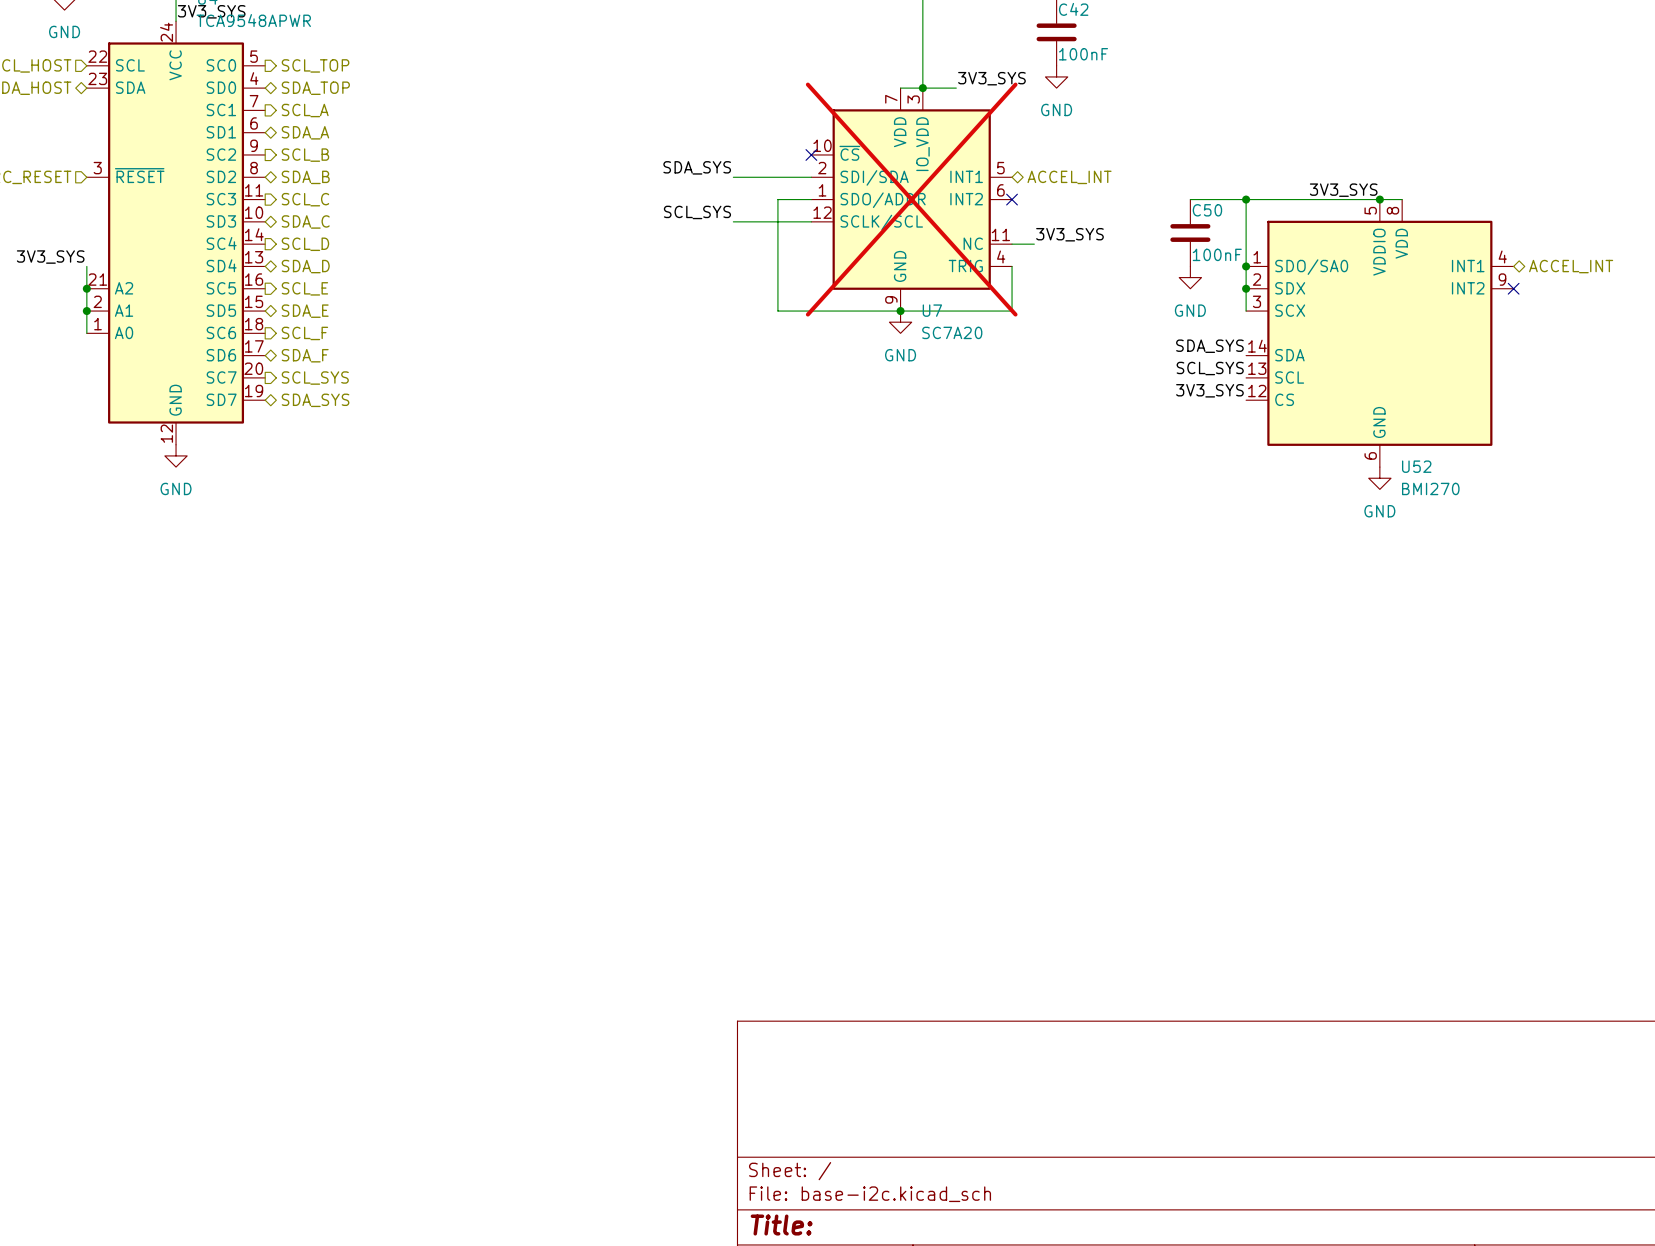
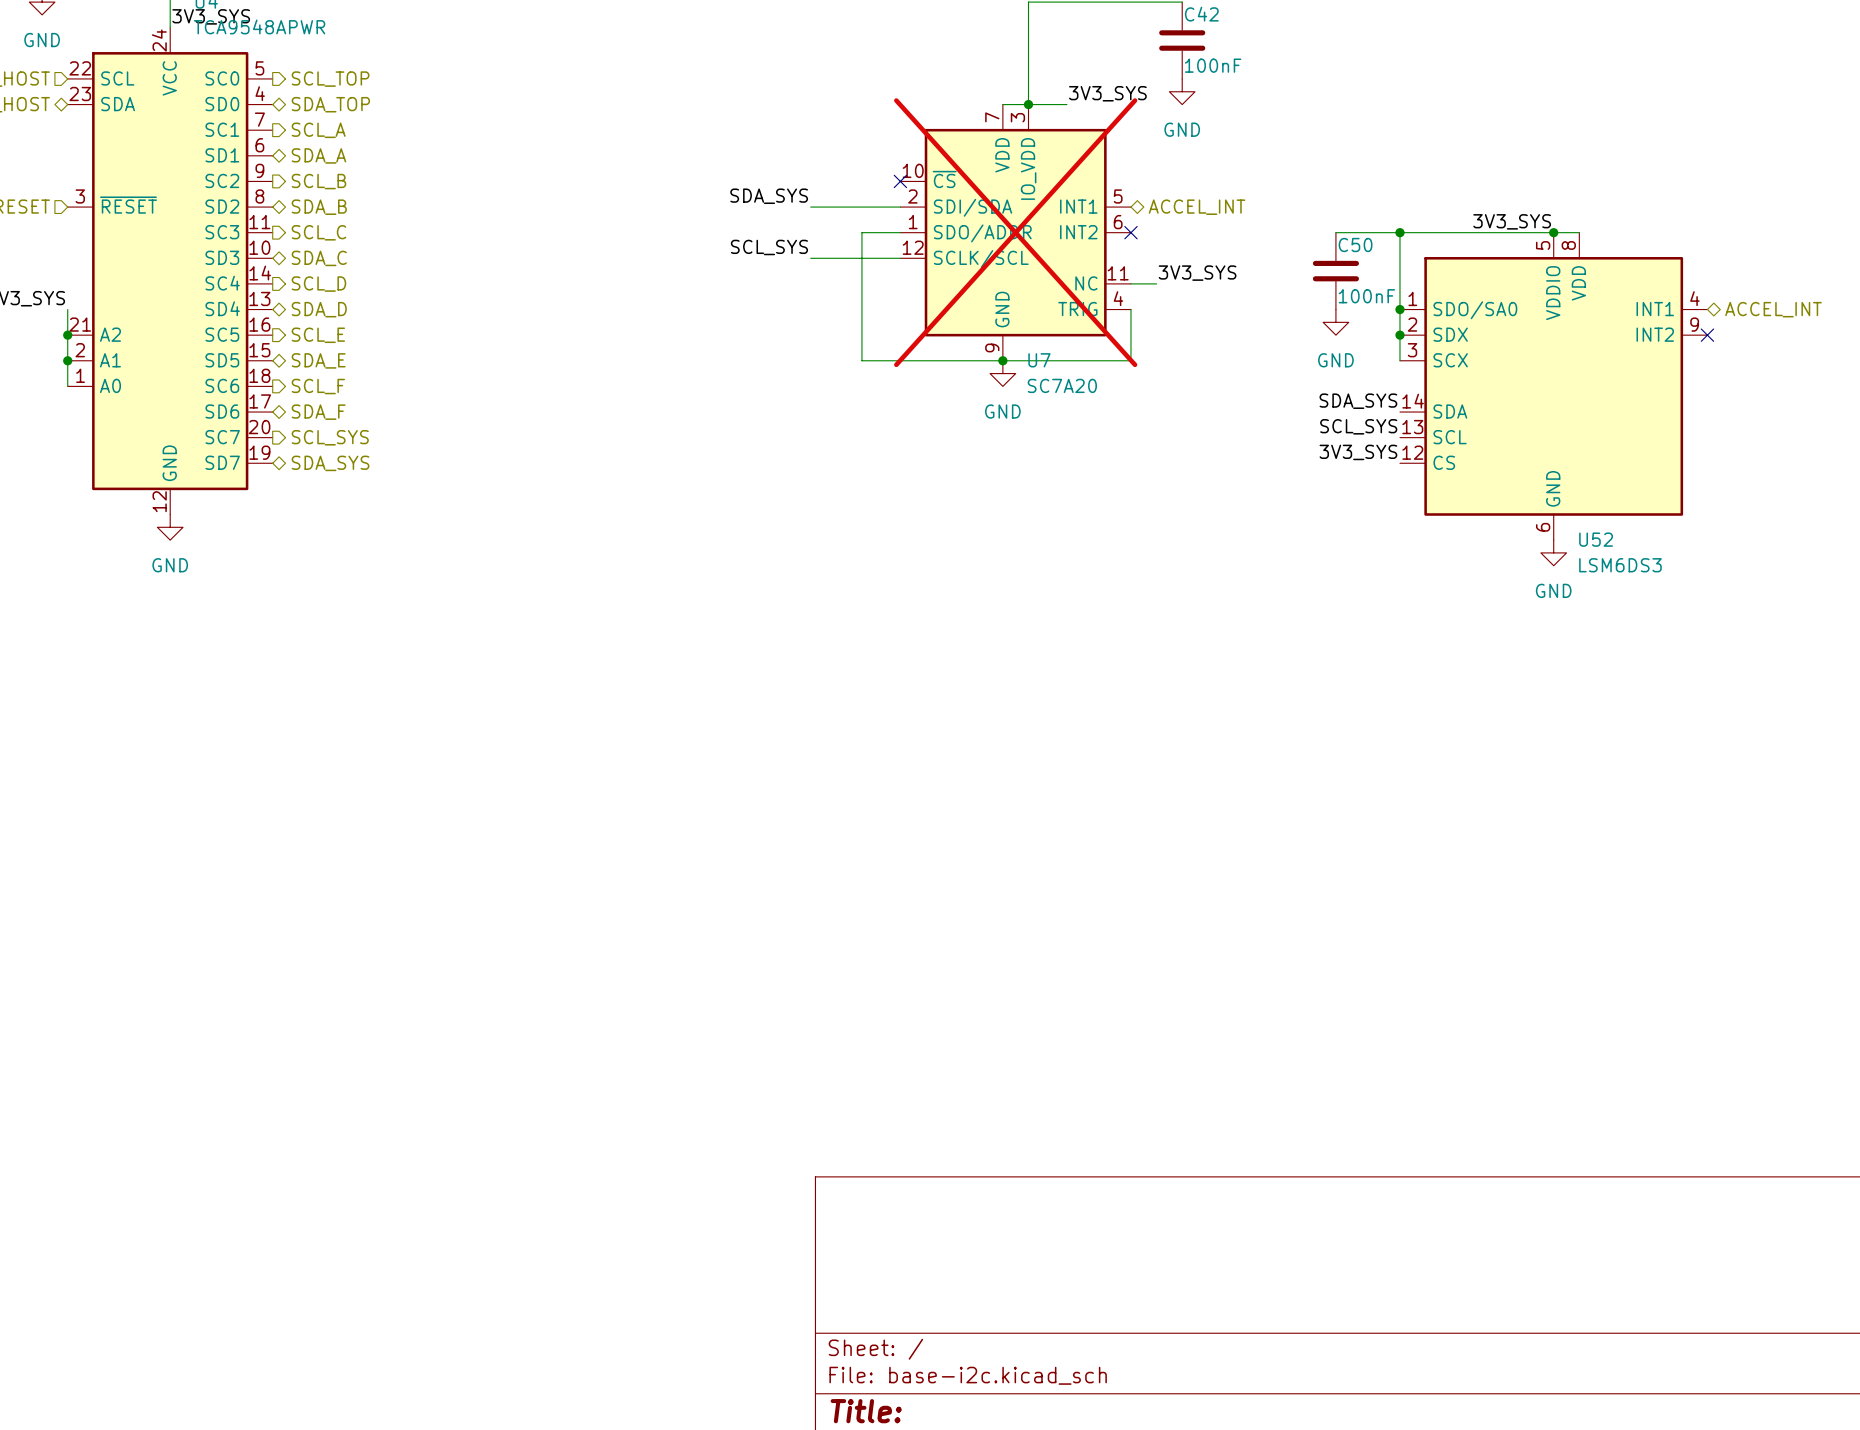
U52 value: BMI270 (1430, 488) -> LSM6DS3 (1620, 565)

